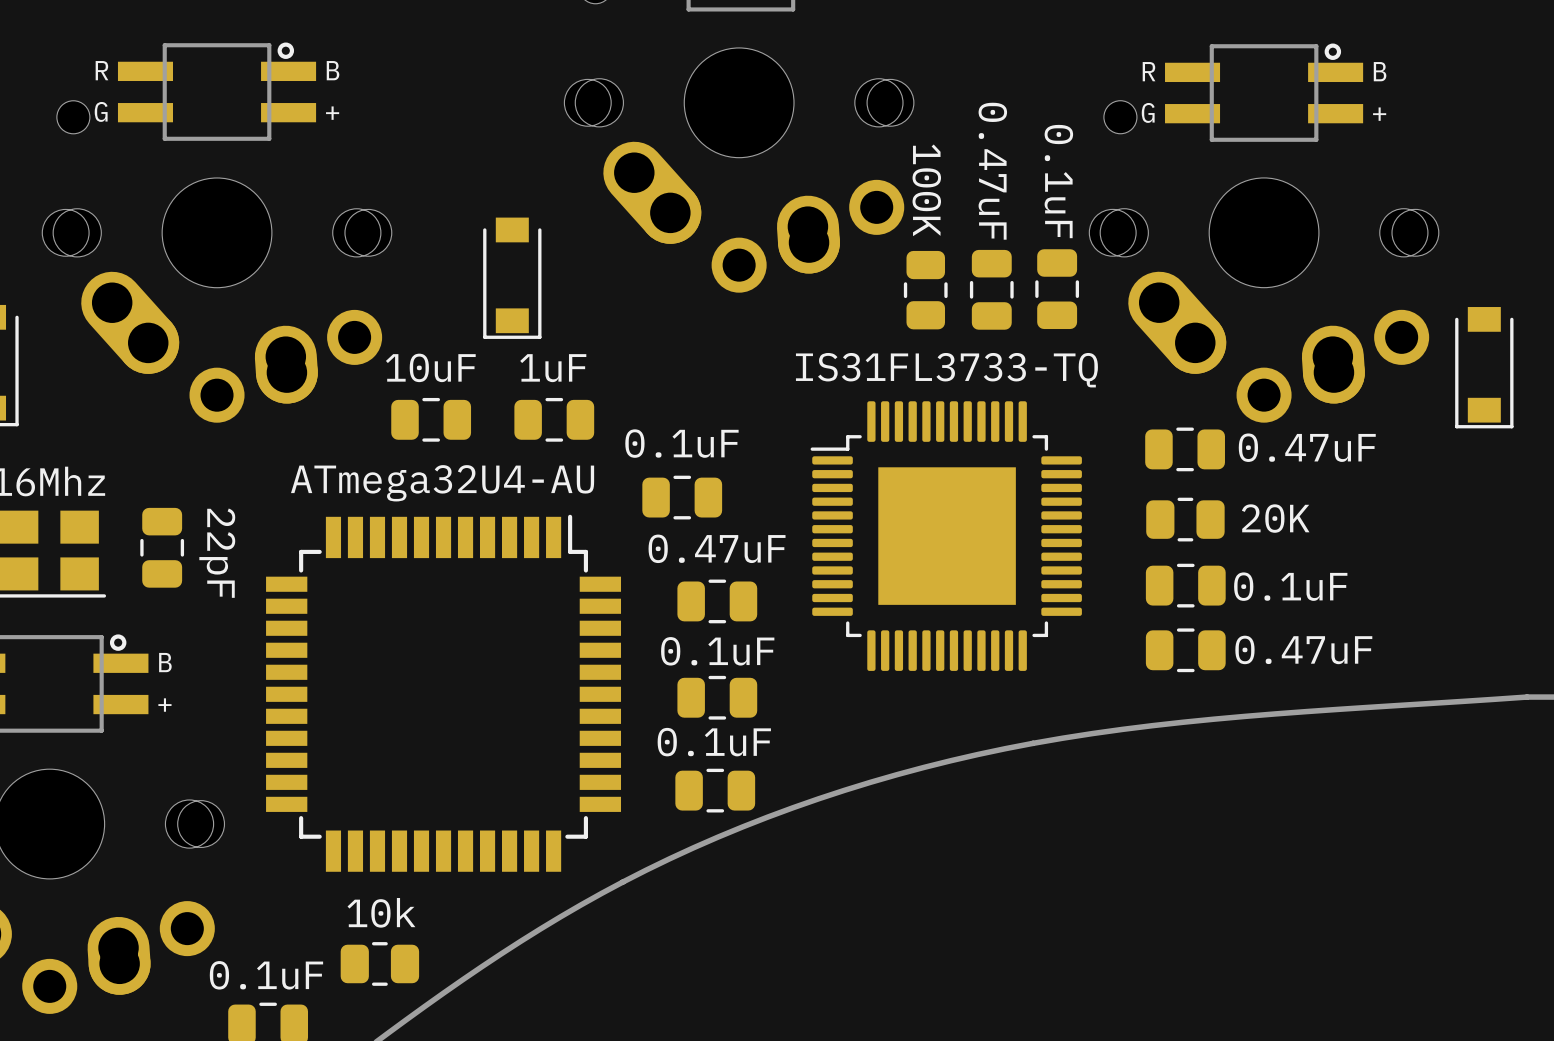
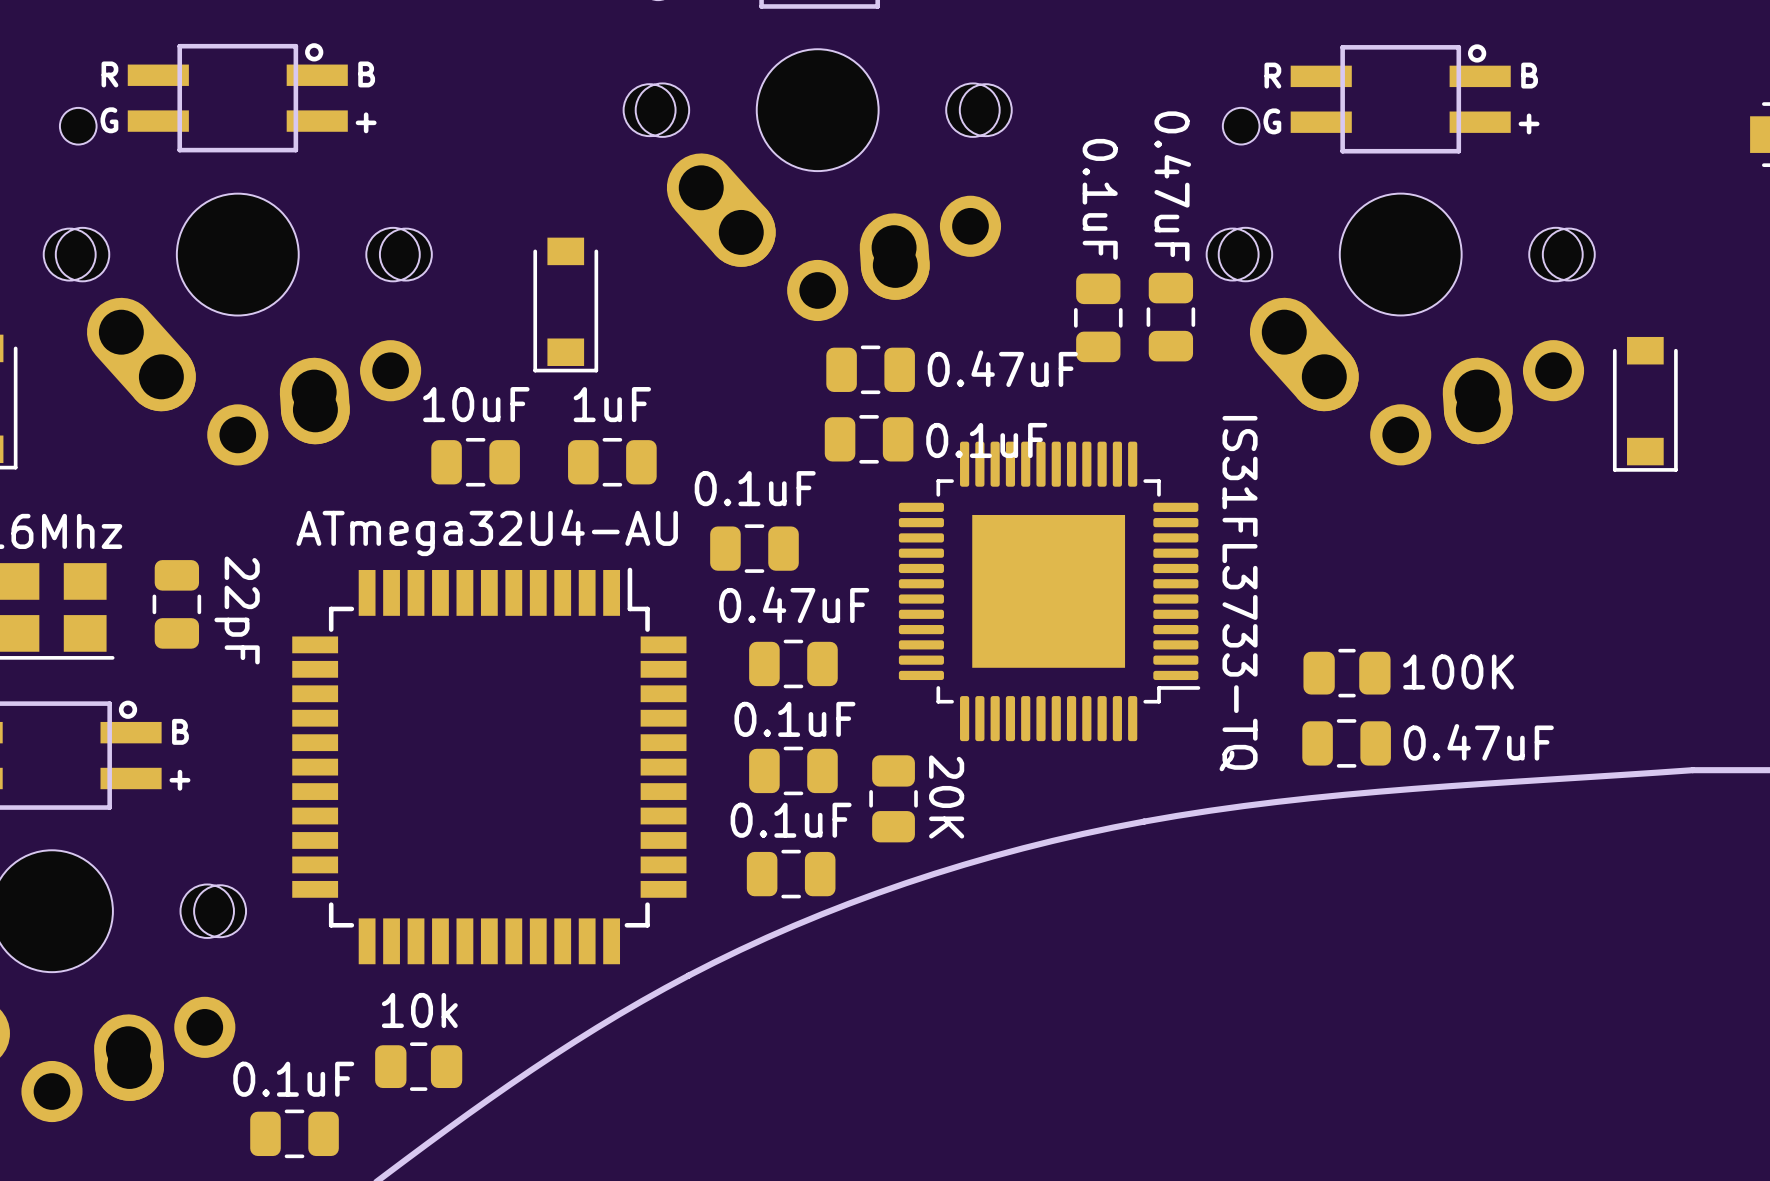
part value: 0.47uF (992, 171) -> 0.1uF (1100, 199)
part value: 0.1uF (1058, 181) -> 0.47uF (1172, 186)
part rotation: 0° (925, 290) -> 90° clockwise (1347, 673)
part position: (925, 290) -> (1347, 673)
part: none -> 0.47uF (870, 369)
part value position: IS31FL3733-TQ (946, 370) -> IS31FL3733-TQ (1238, 593)
part: 0.47uF (1185, 449) -> none
part rotation: 0° (1185, 519) -> 90° clockwise (893, 798)
part position: (1185, 519) -> (893, 798)
part rotation: 0° (946, 536) -> 180° (1049, 591)
part position: (1185, 585) -> (869, 439)
part position: (1185, 650) -> (1346, 743)

